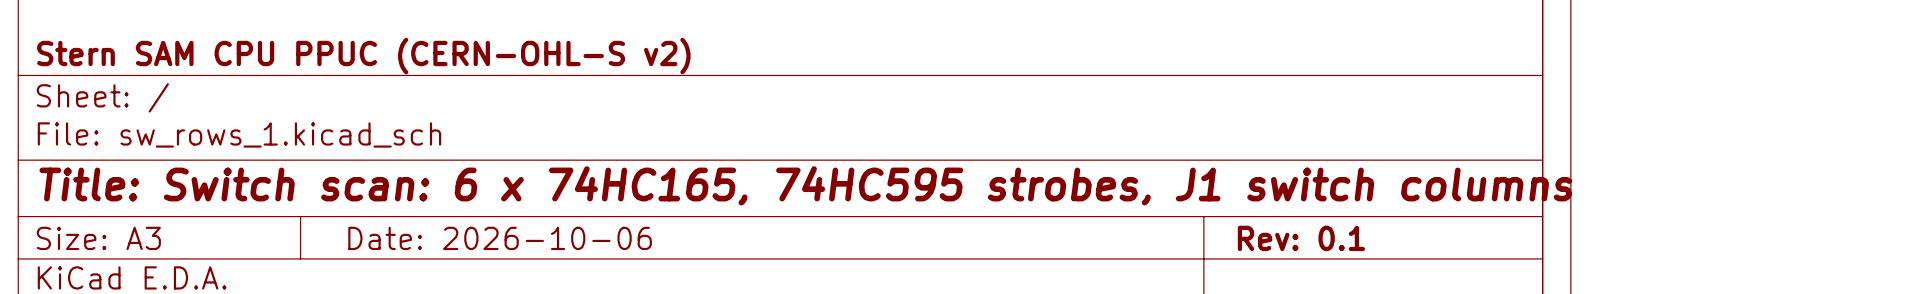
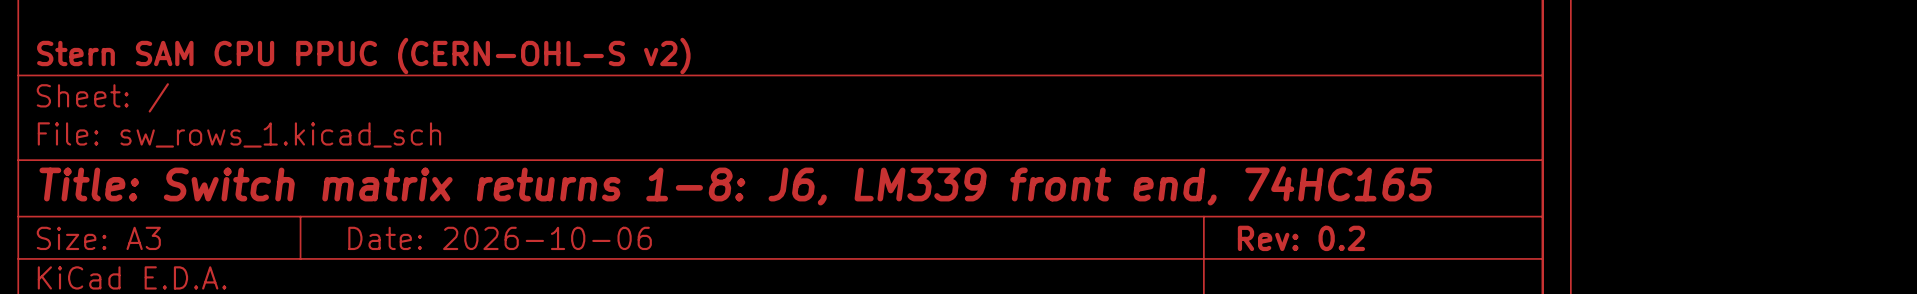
title block: Title: Switch scan: 6 x 74HC165, 74HC595 strobes, J1 switch columns (805, 185) -> Title: Switch matrix returns 1-8: J6, LM339 front end, 74HC165 (735, 185)
title block: Rev: 0.1 (1301, 238) -> Rev: 0.2 (1301, 238)

